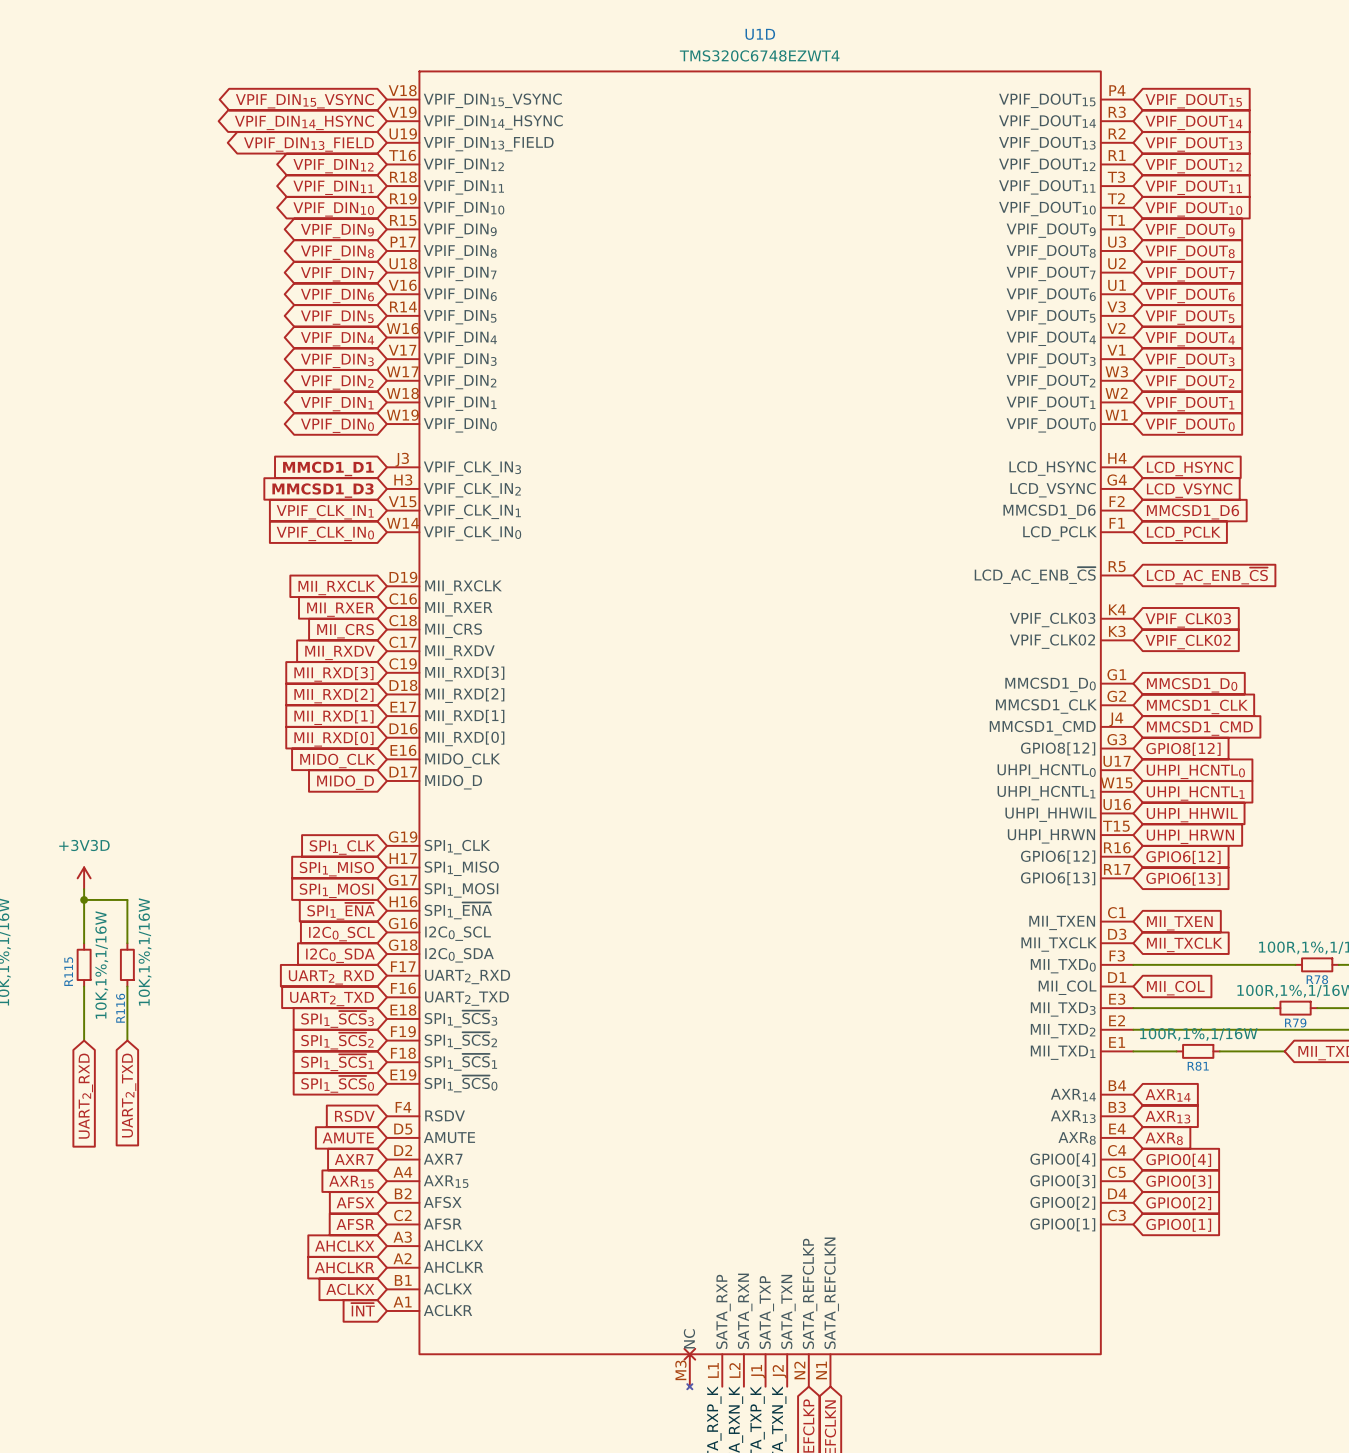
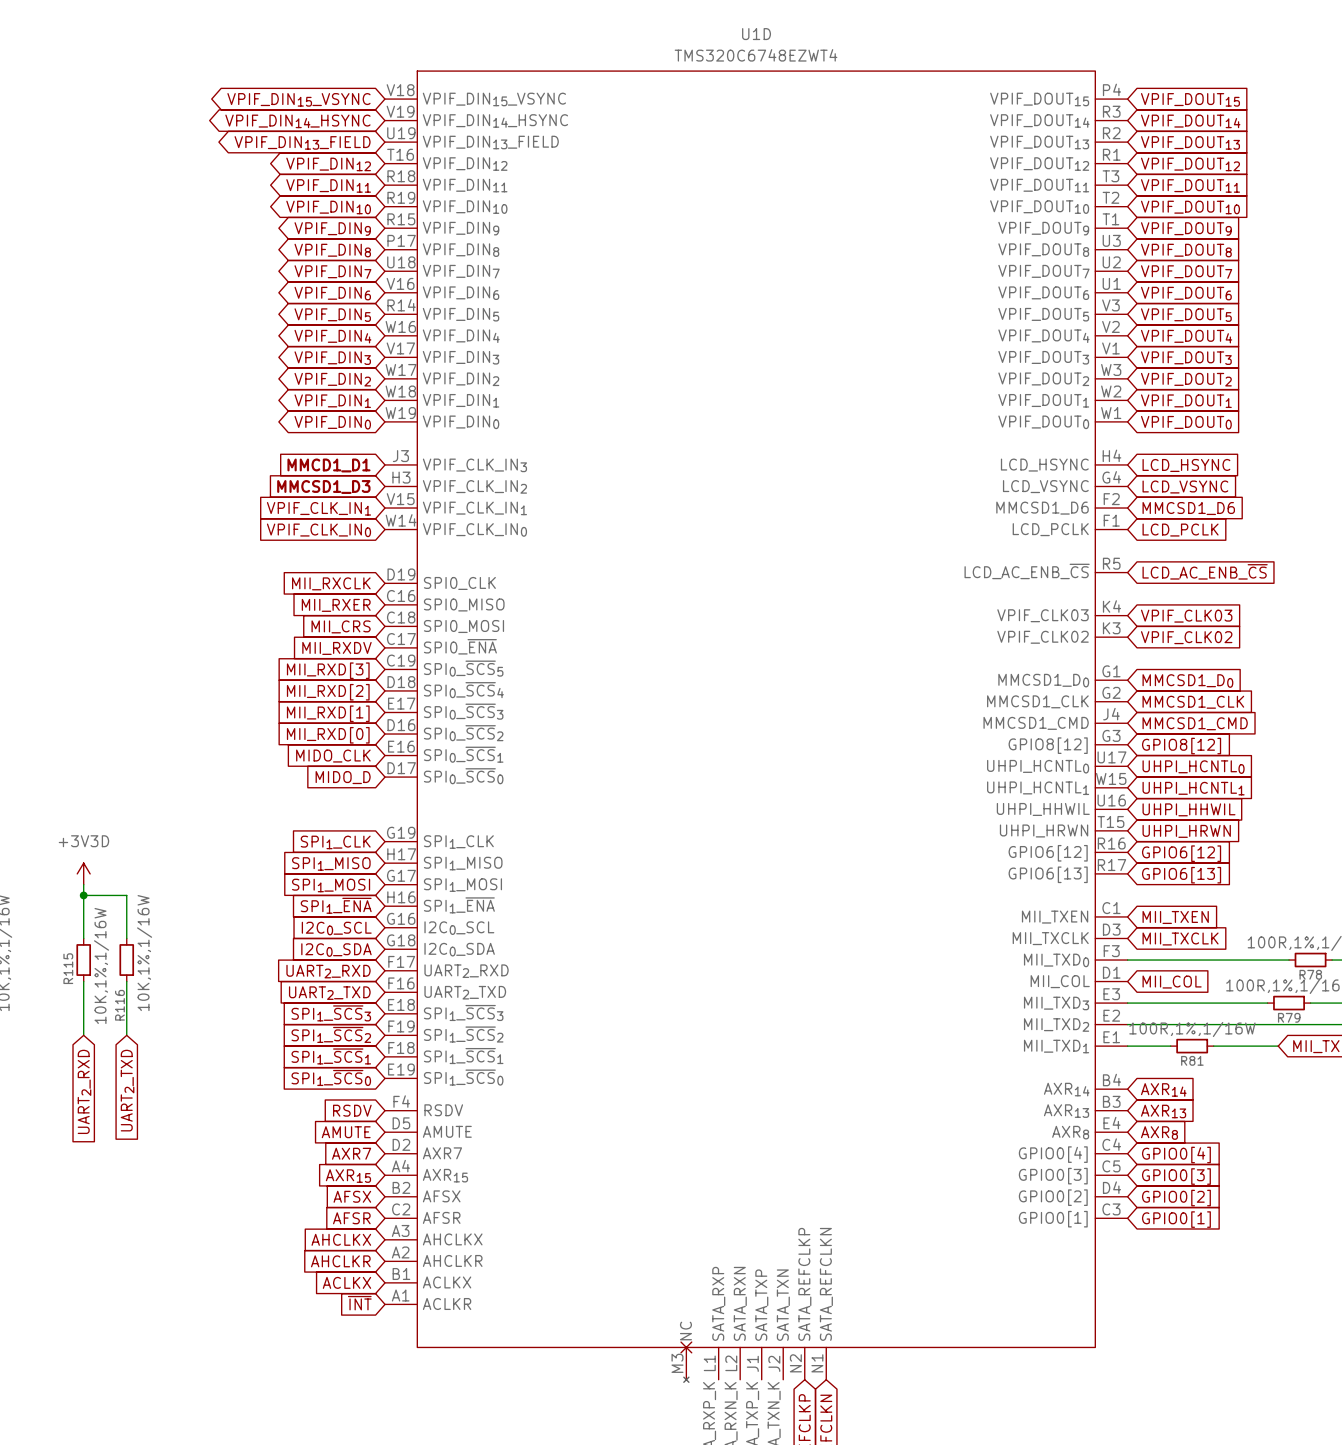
U1D symbol: [386, 71, 1134, 1390] -> [384, 71, 1128, 1383]

